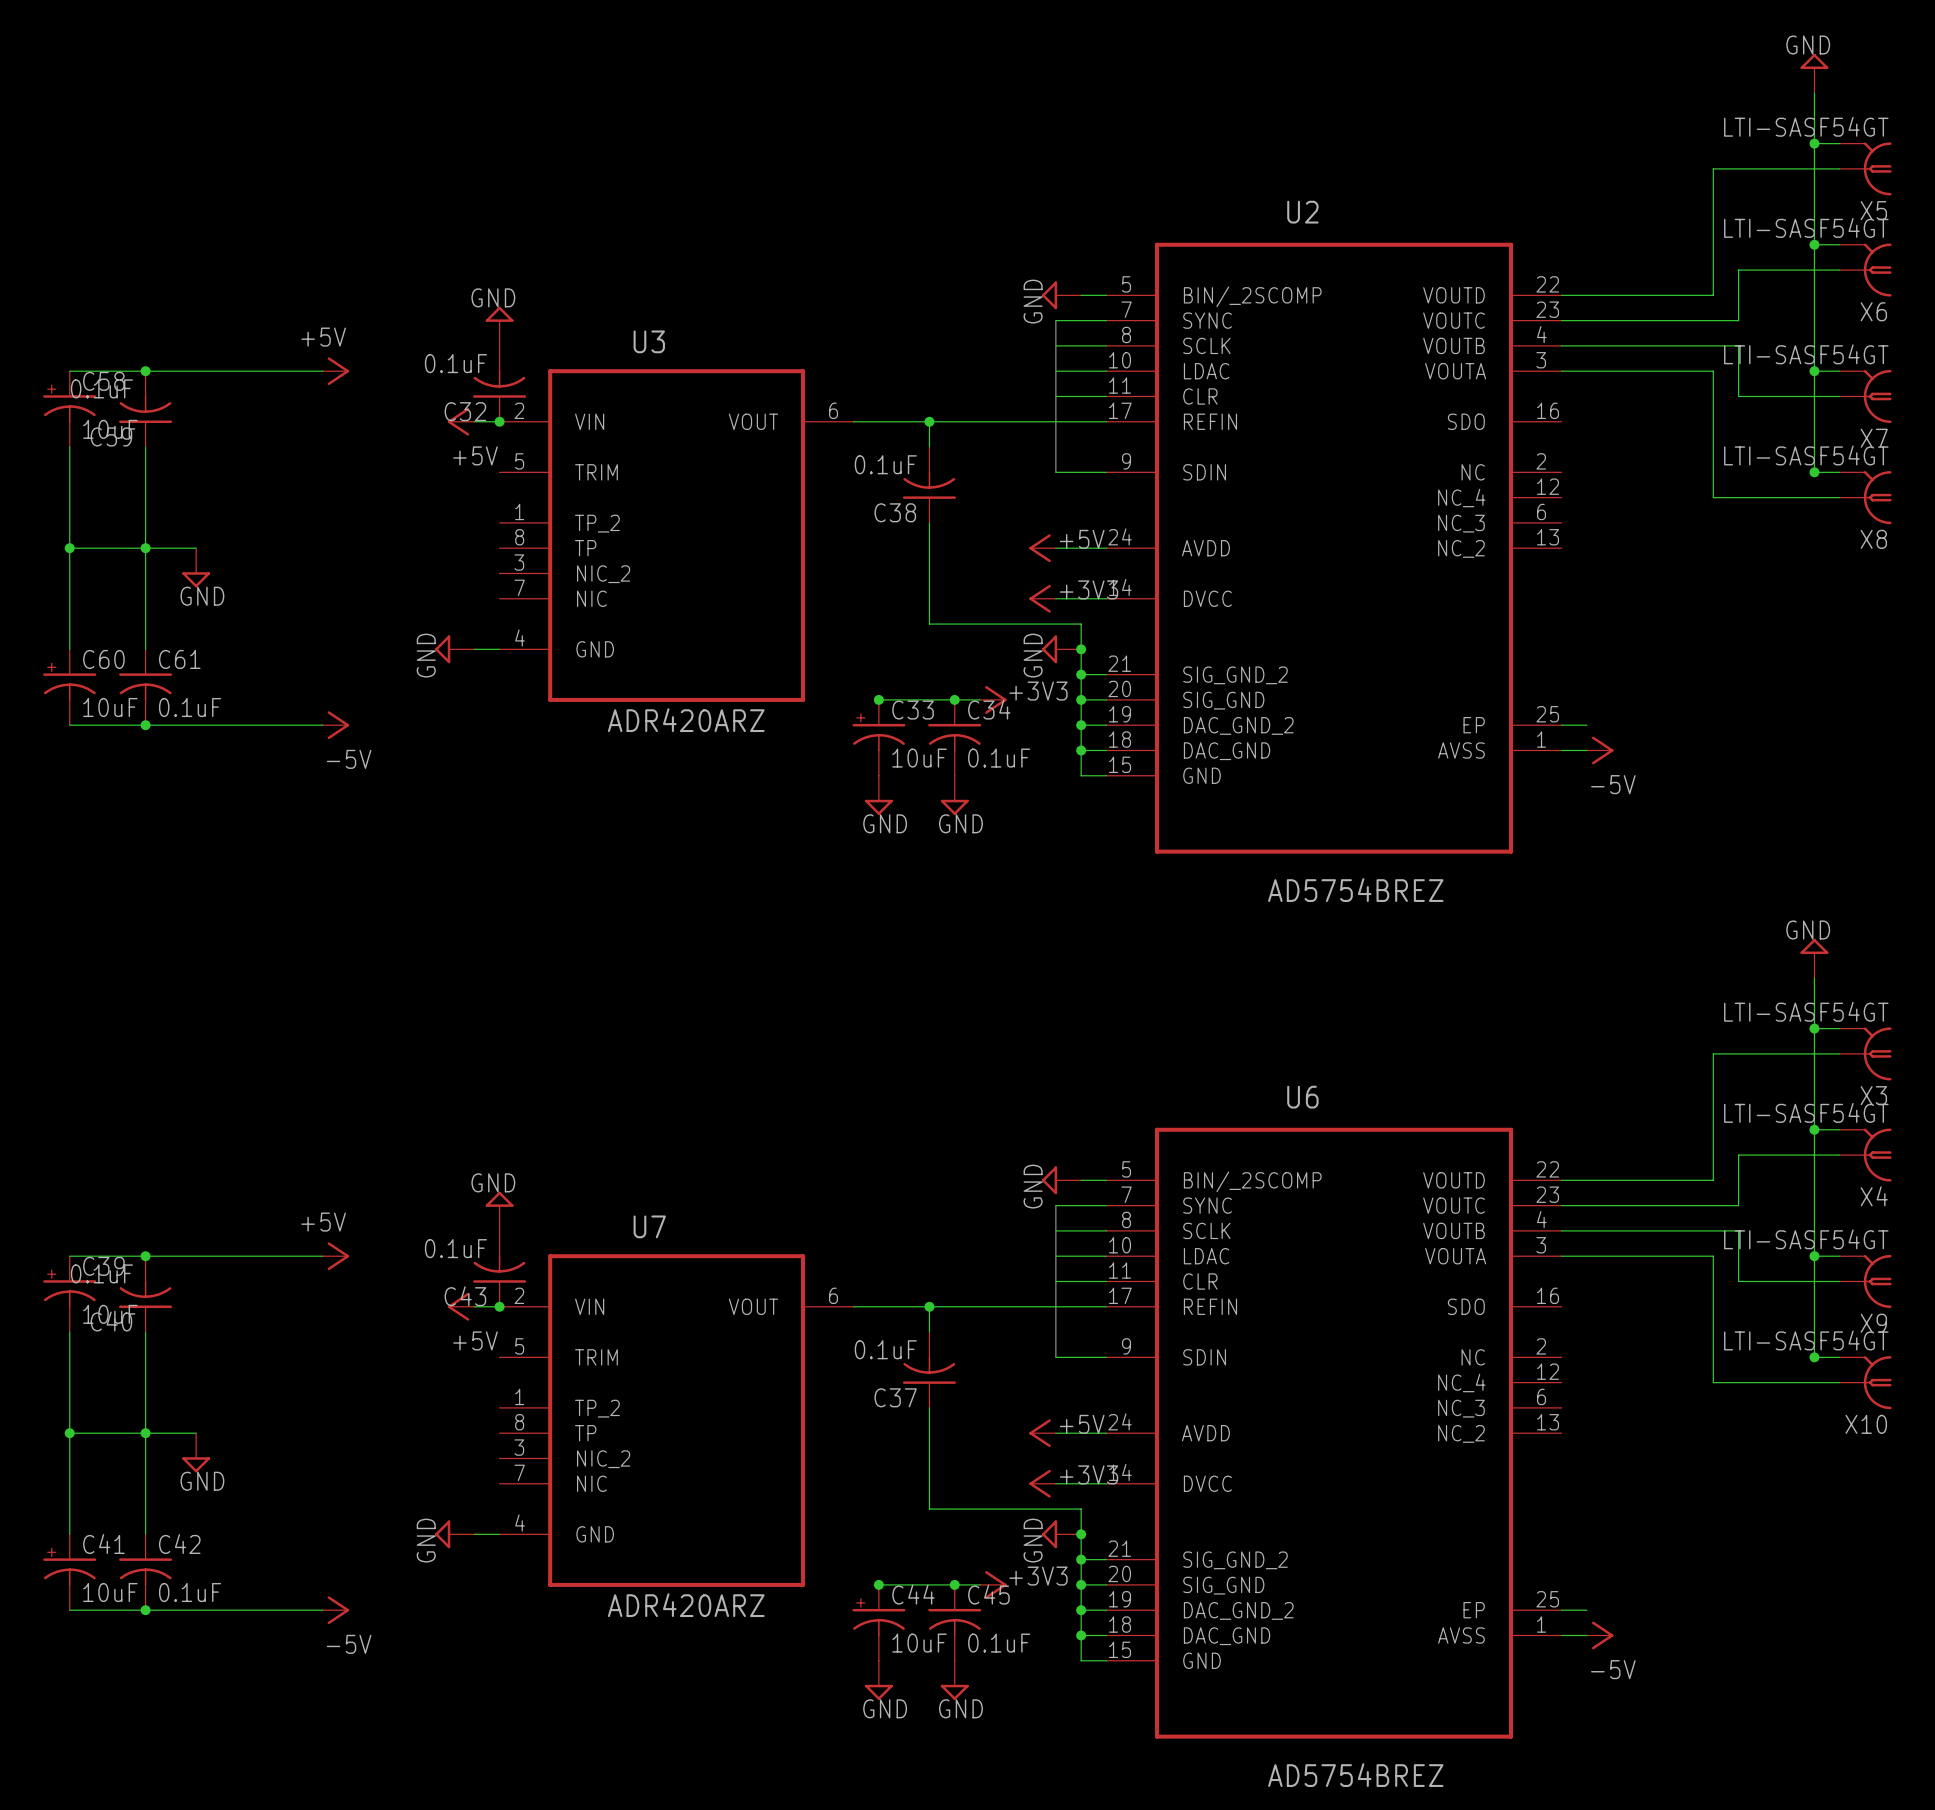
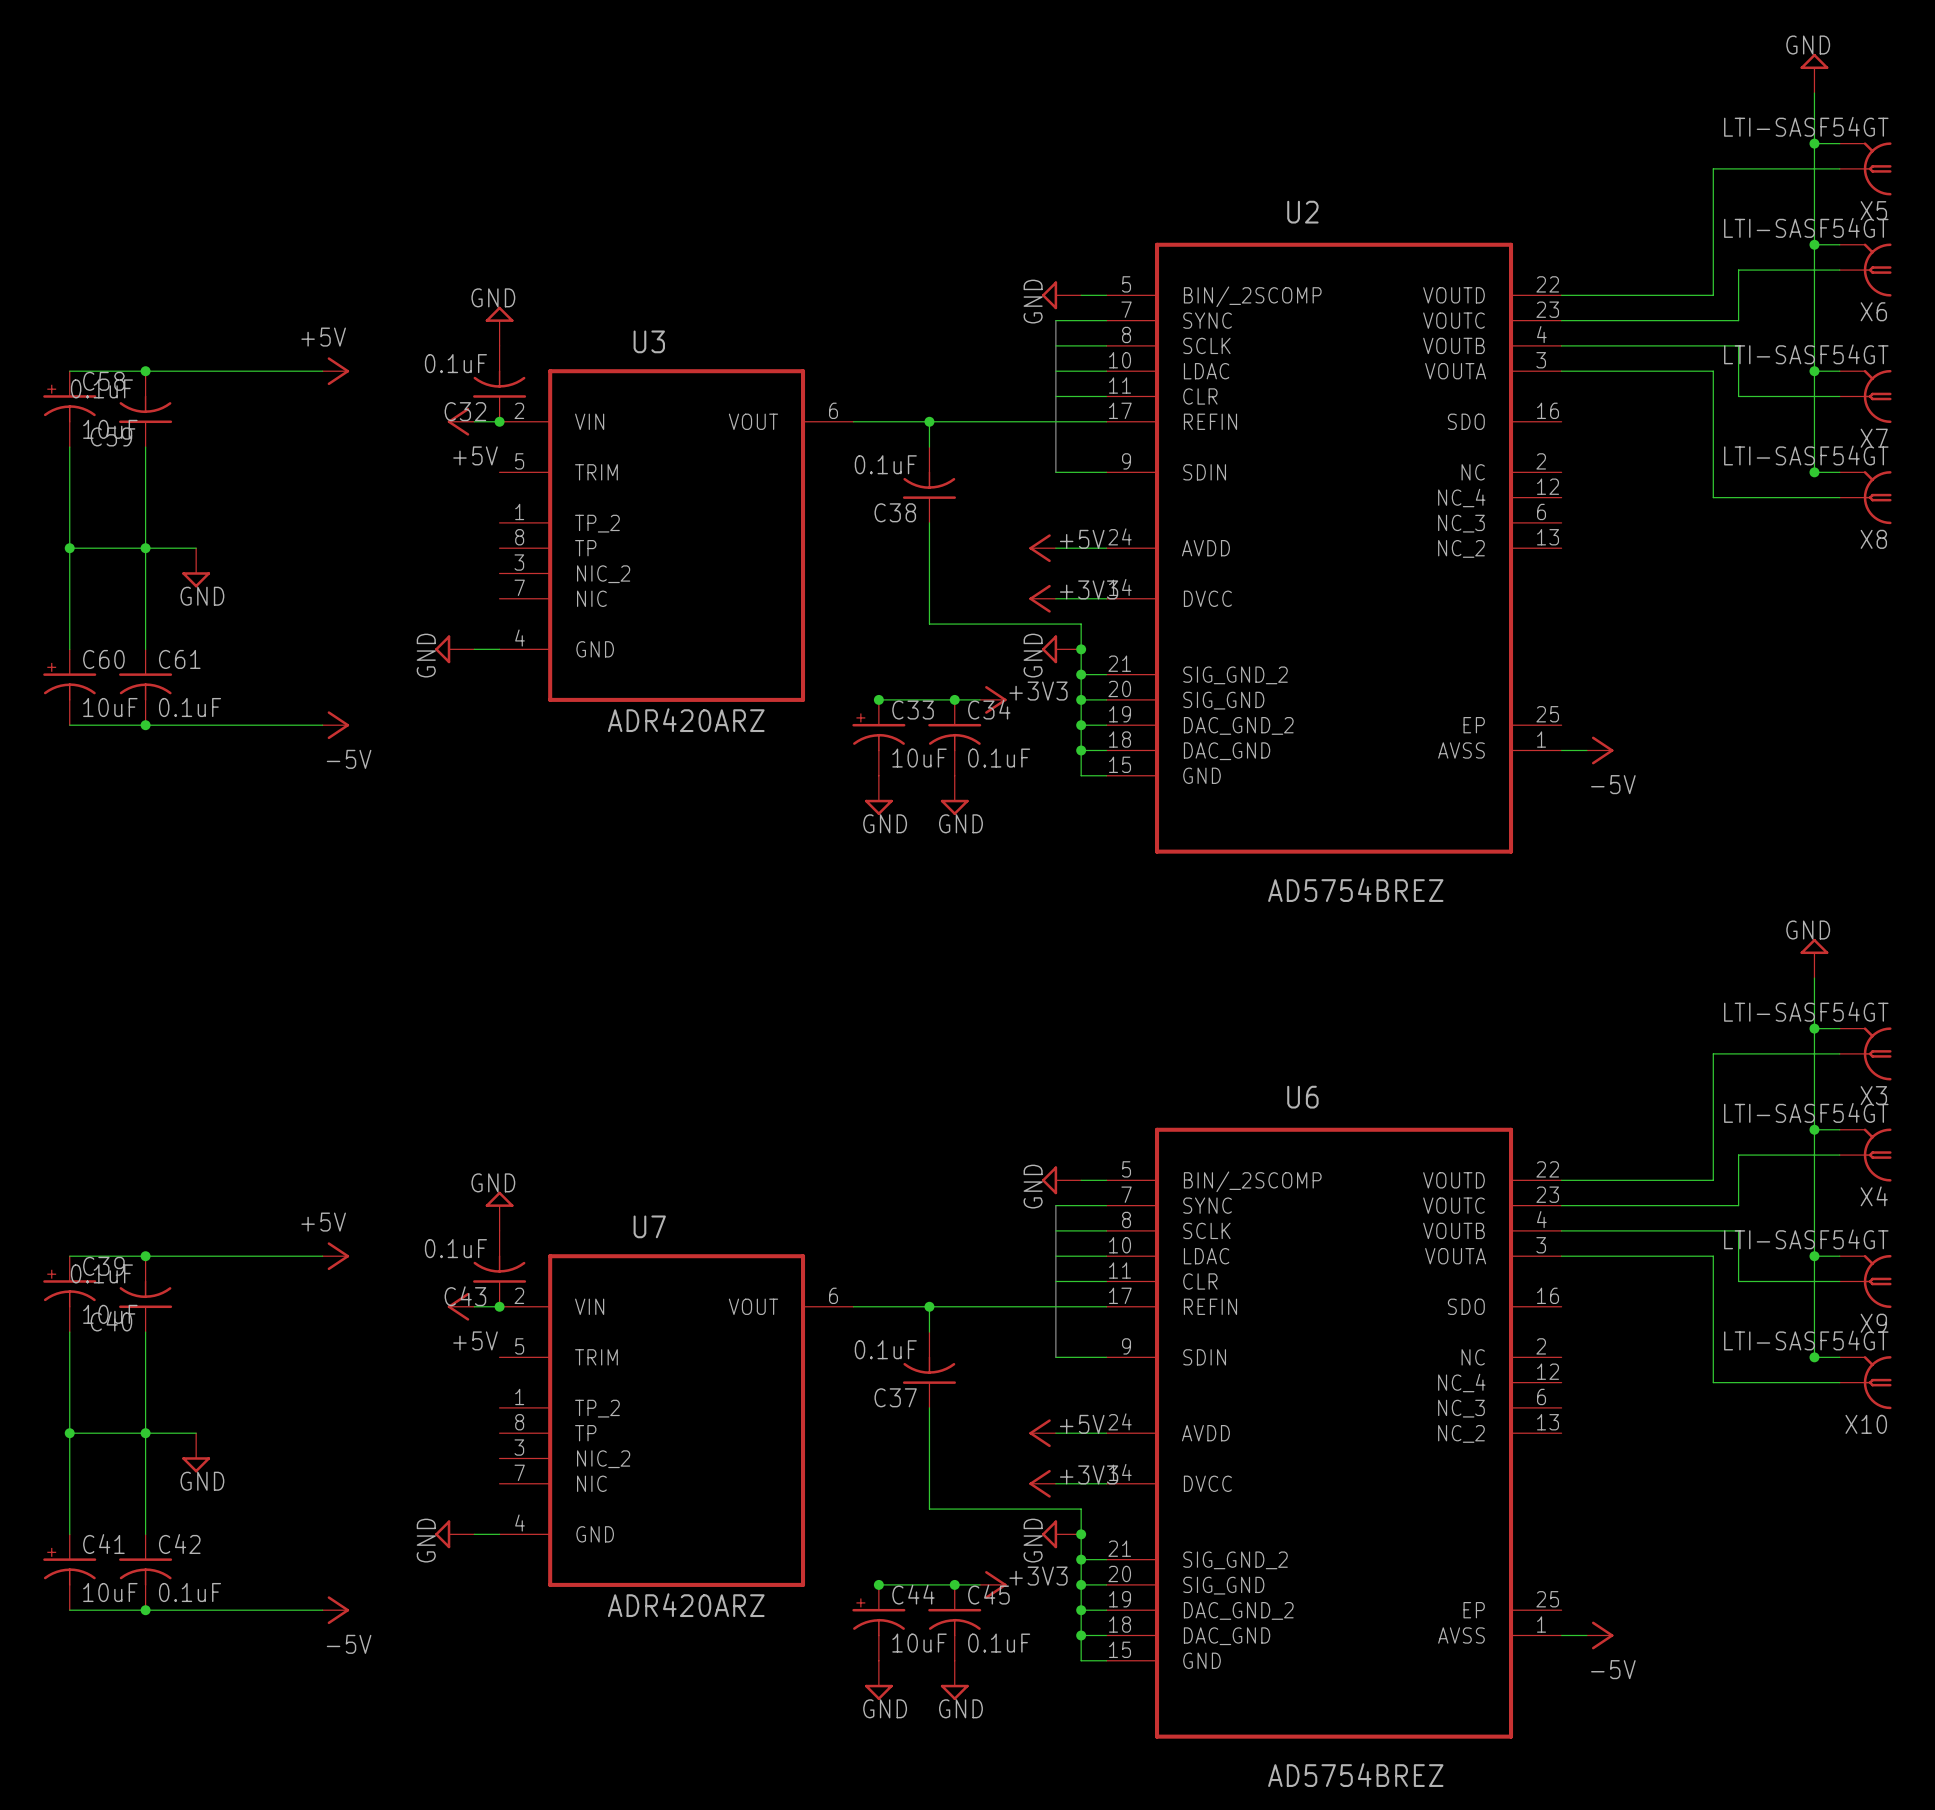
wire: (1561, 725) (1586, 725) -> none
wire: (1561, 1610) (1586, 1610) -> none

